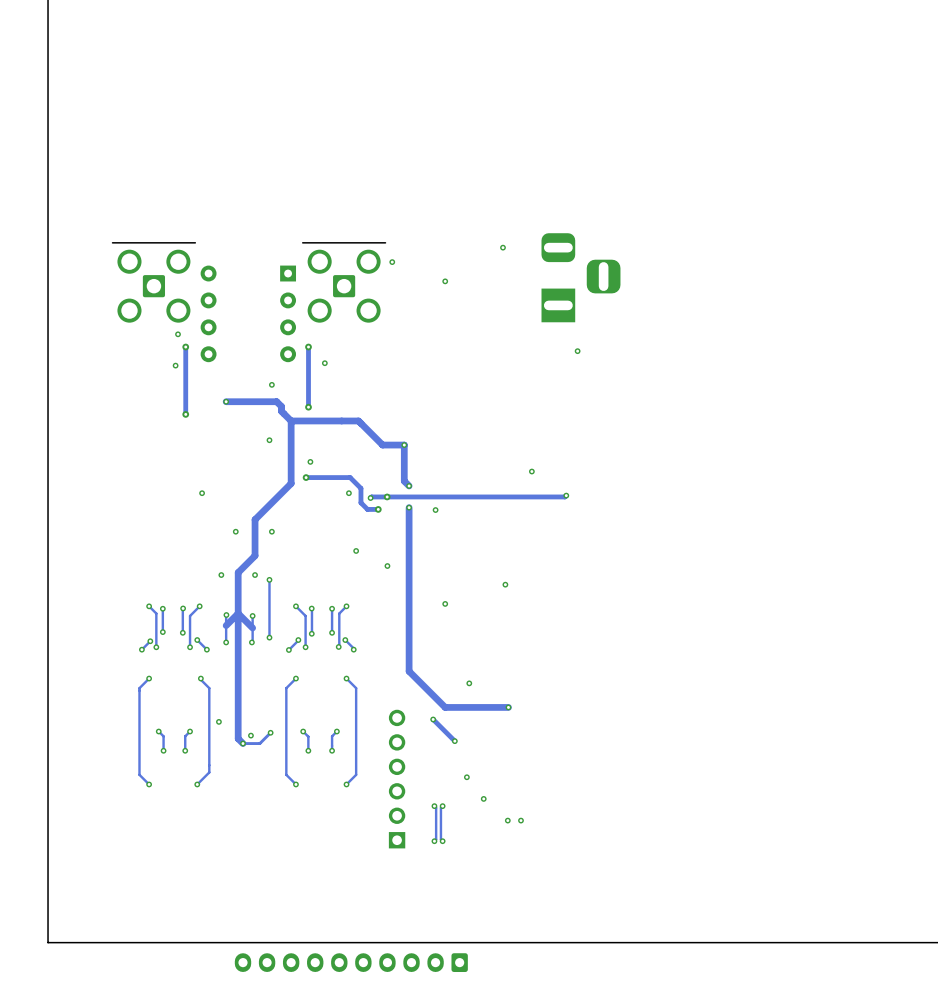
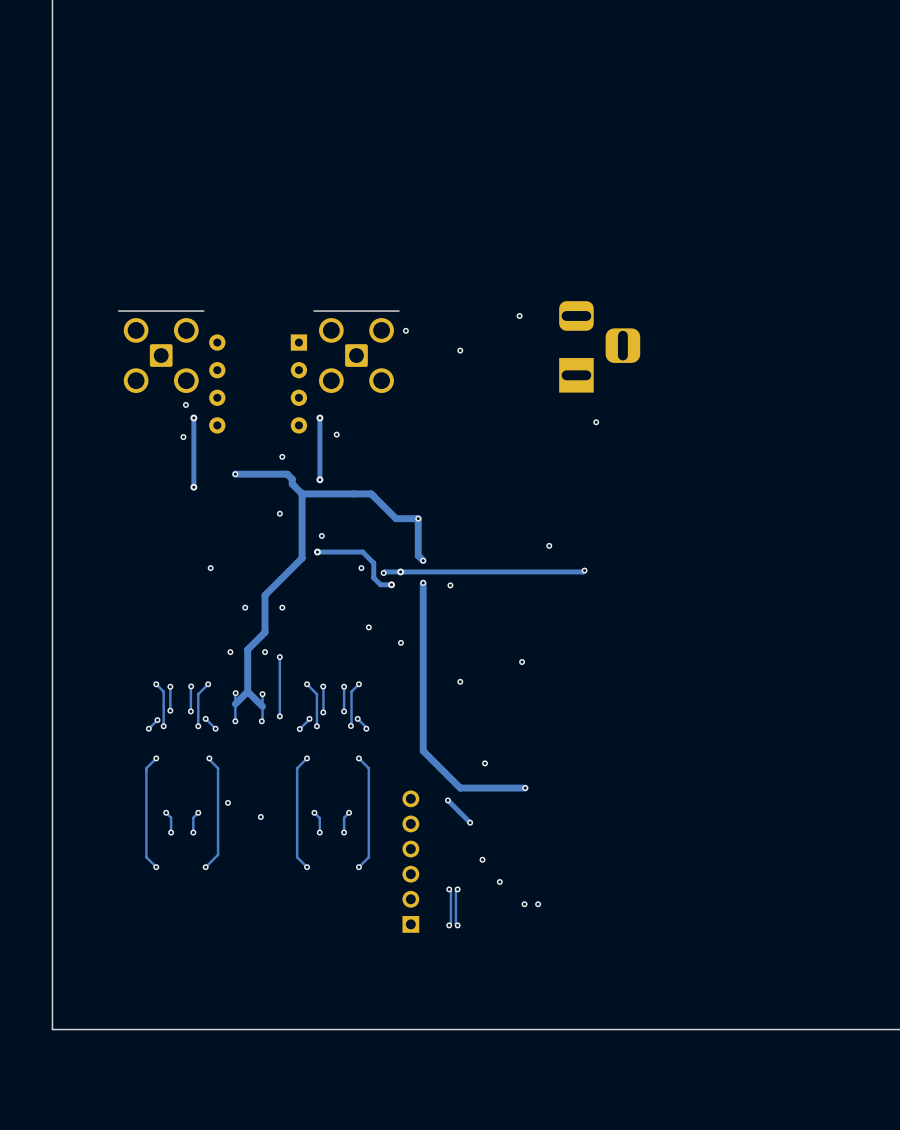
track: (238, 613) (238, 738) (243, 743) (259, 743) (270, 732) -> none
via: (270, 732) -> none
via: (243, 743) -> none
part: (351, 962) -> none

